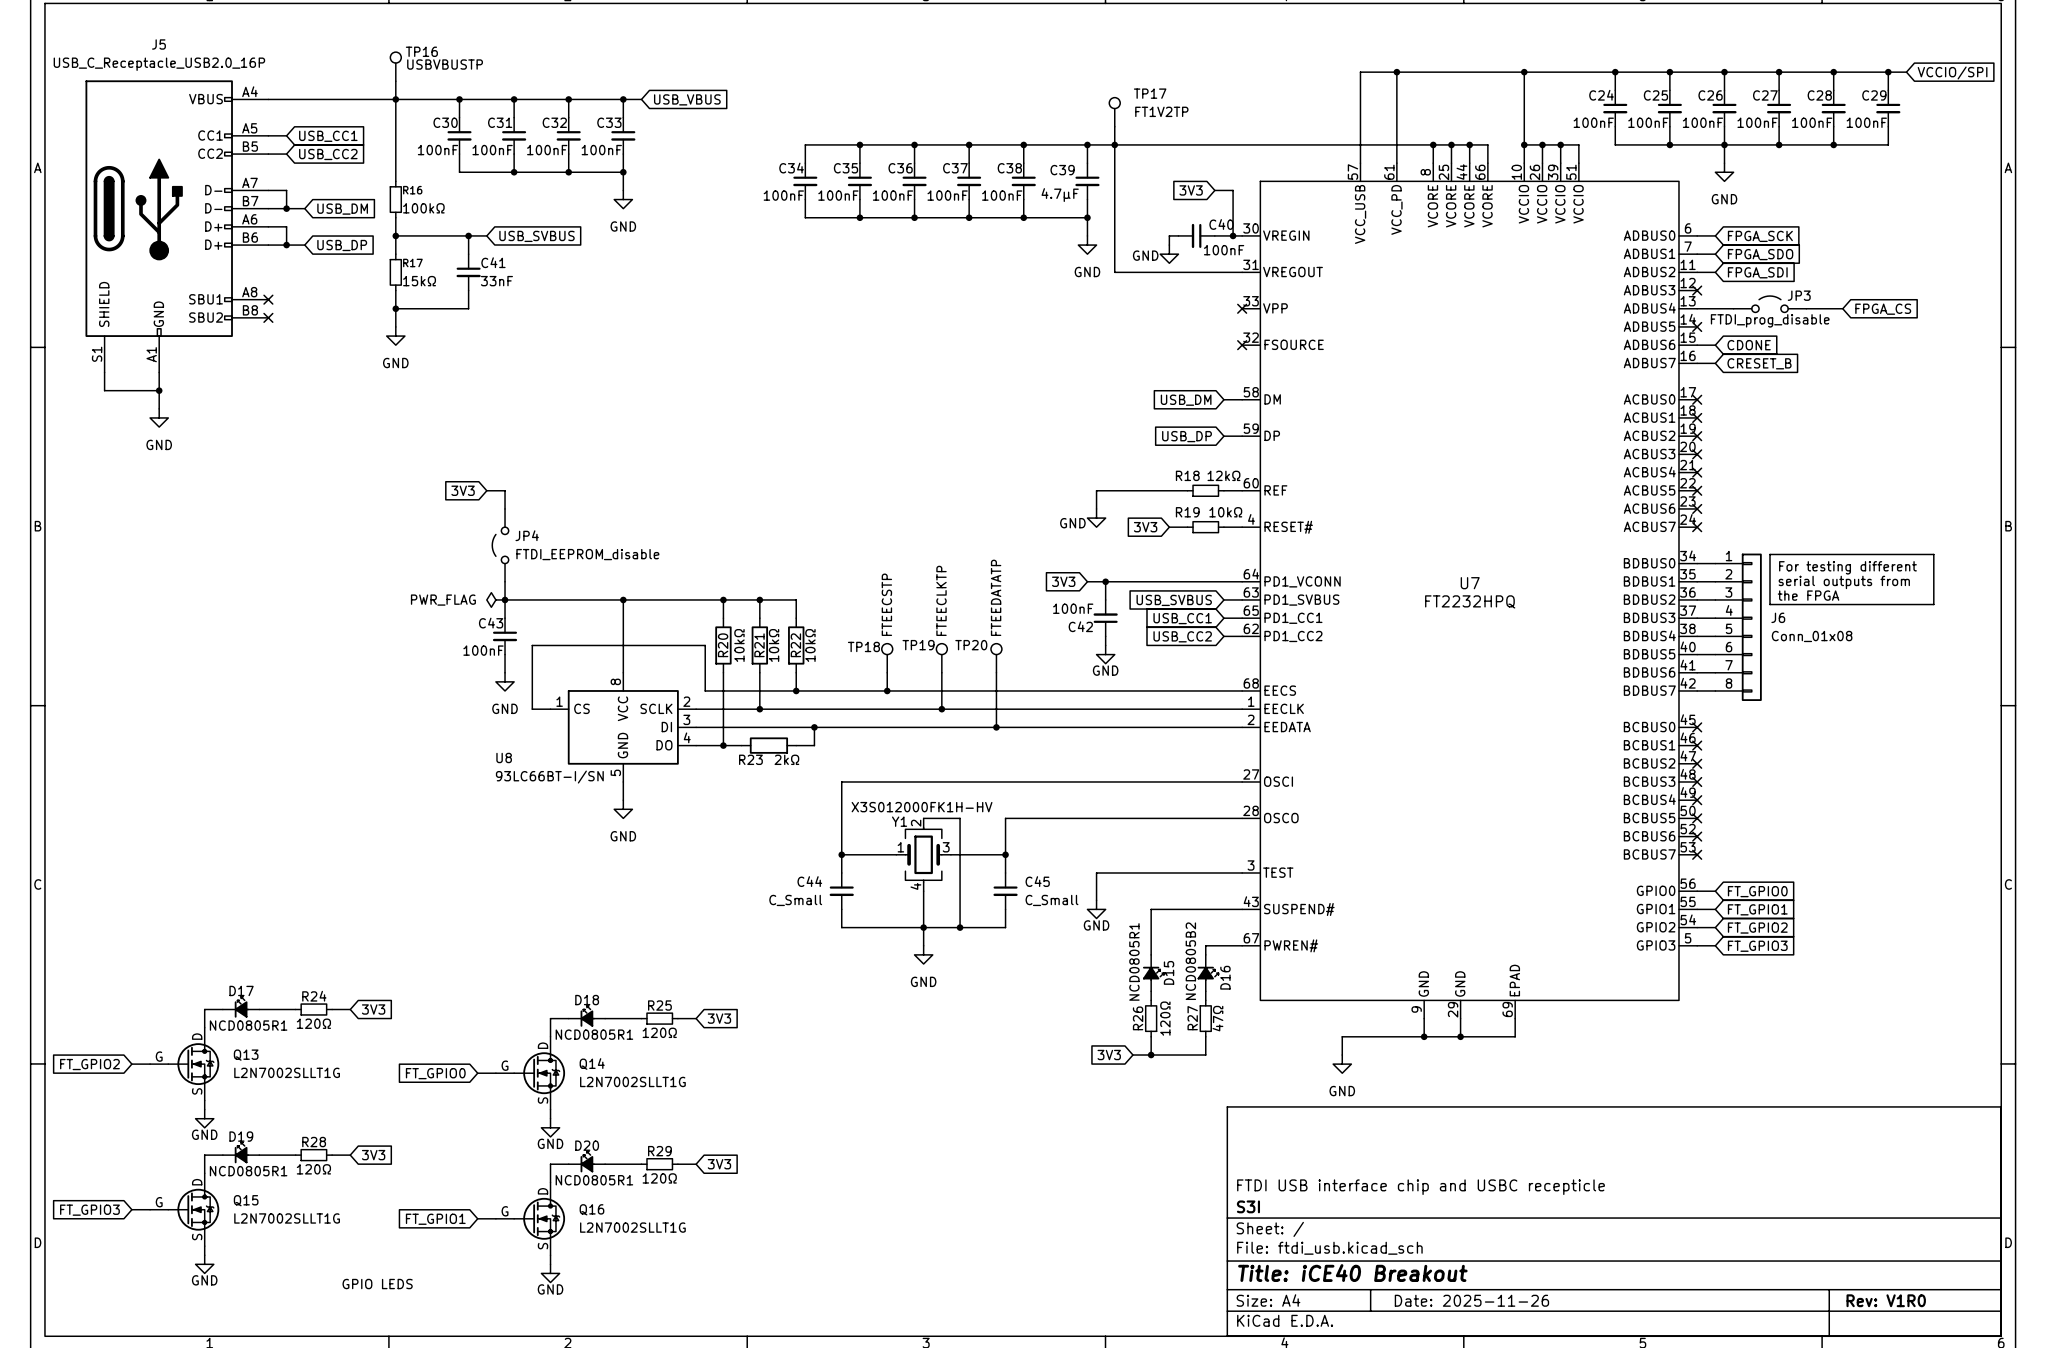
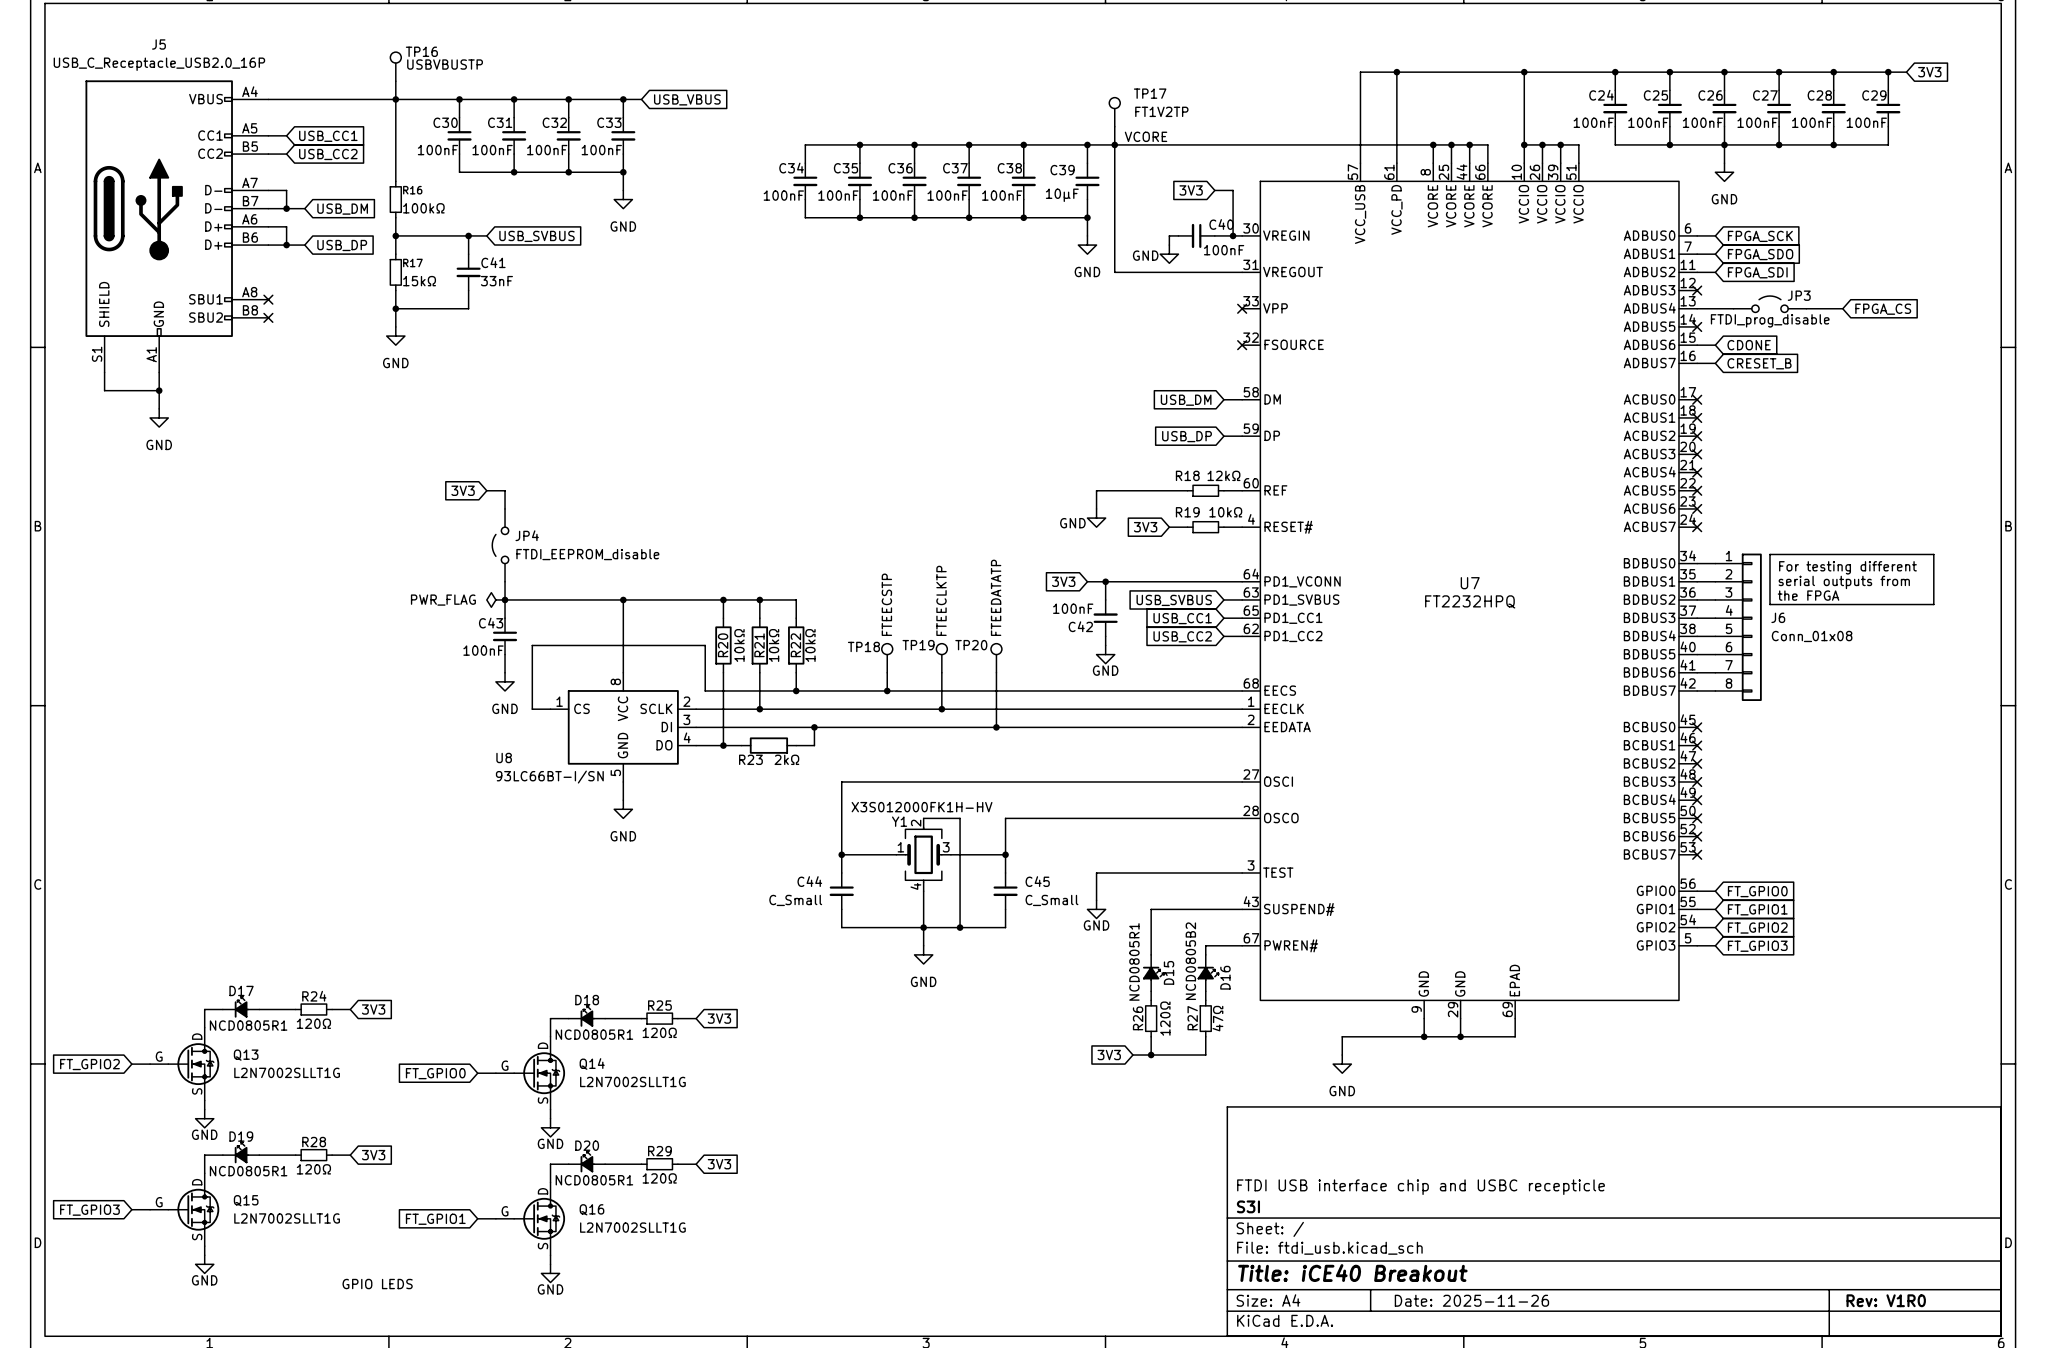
global label: VCCIO/SPI (1952, 73) -> 3V3 (1929, 72)
label: none -> VCORE (1146, 136)
C39 value: 4.7μF (1060, 195) -> 10μF (1062, 195)

